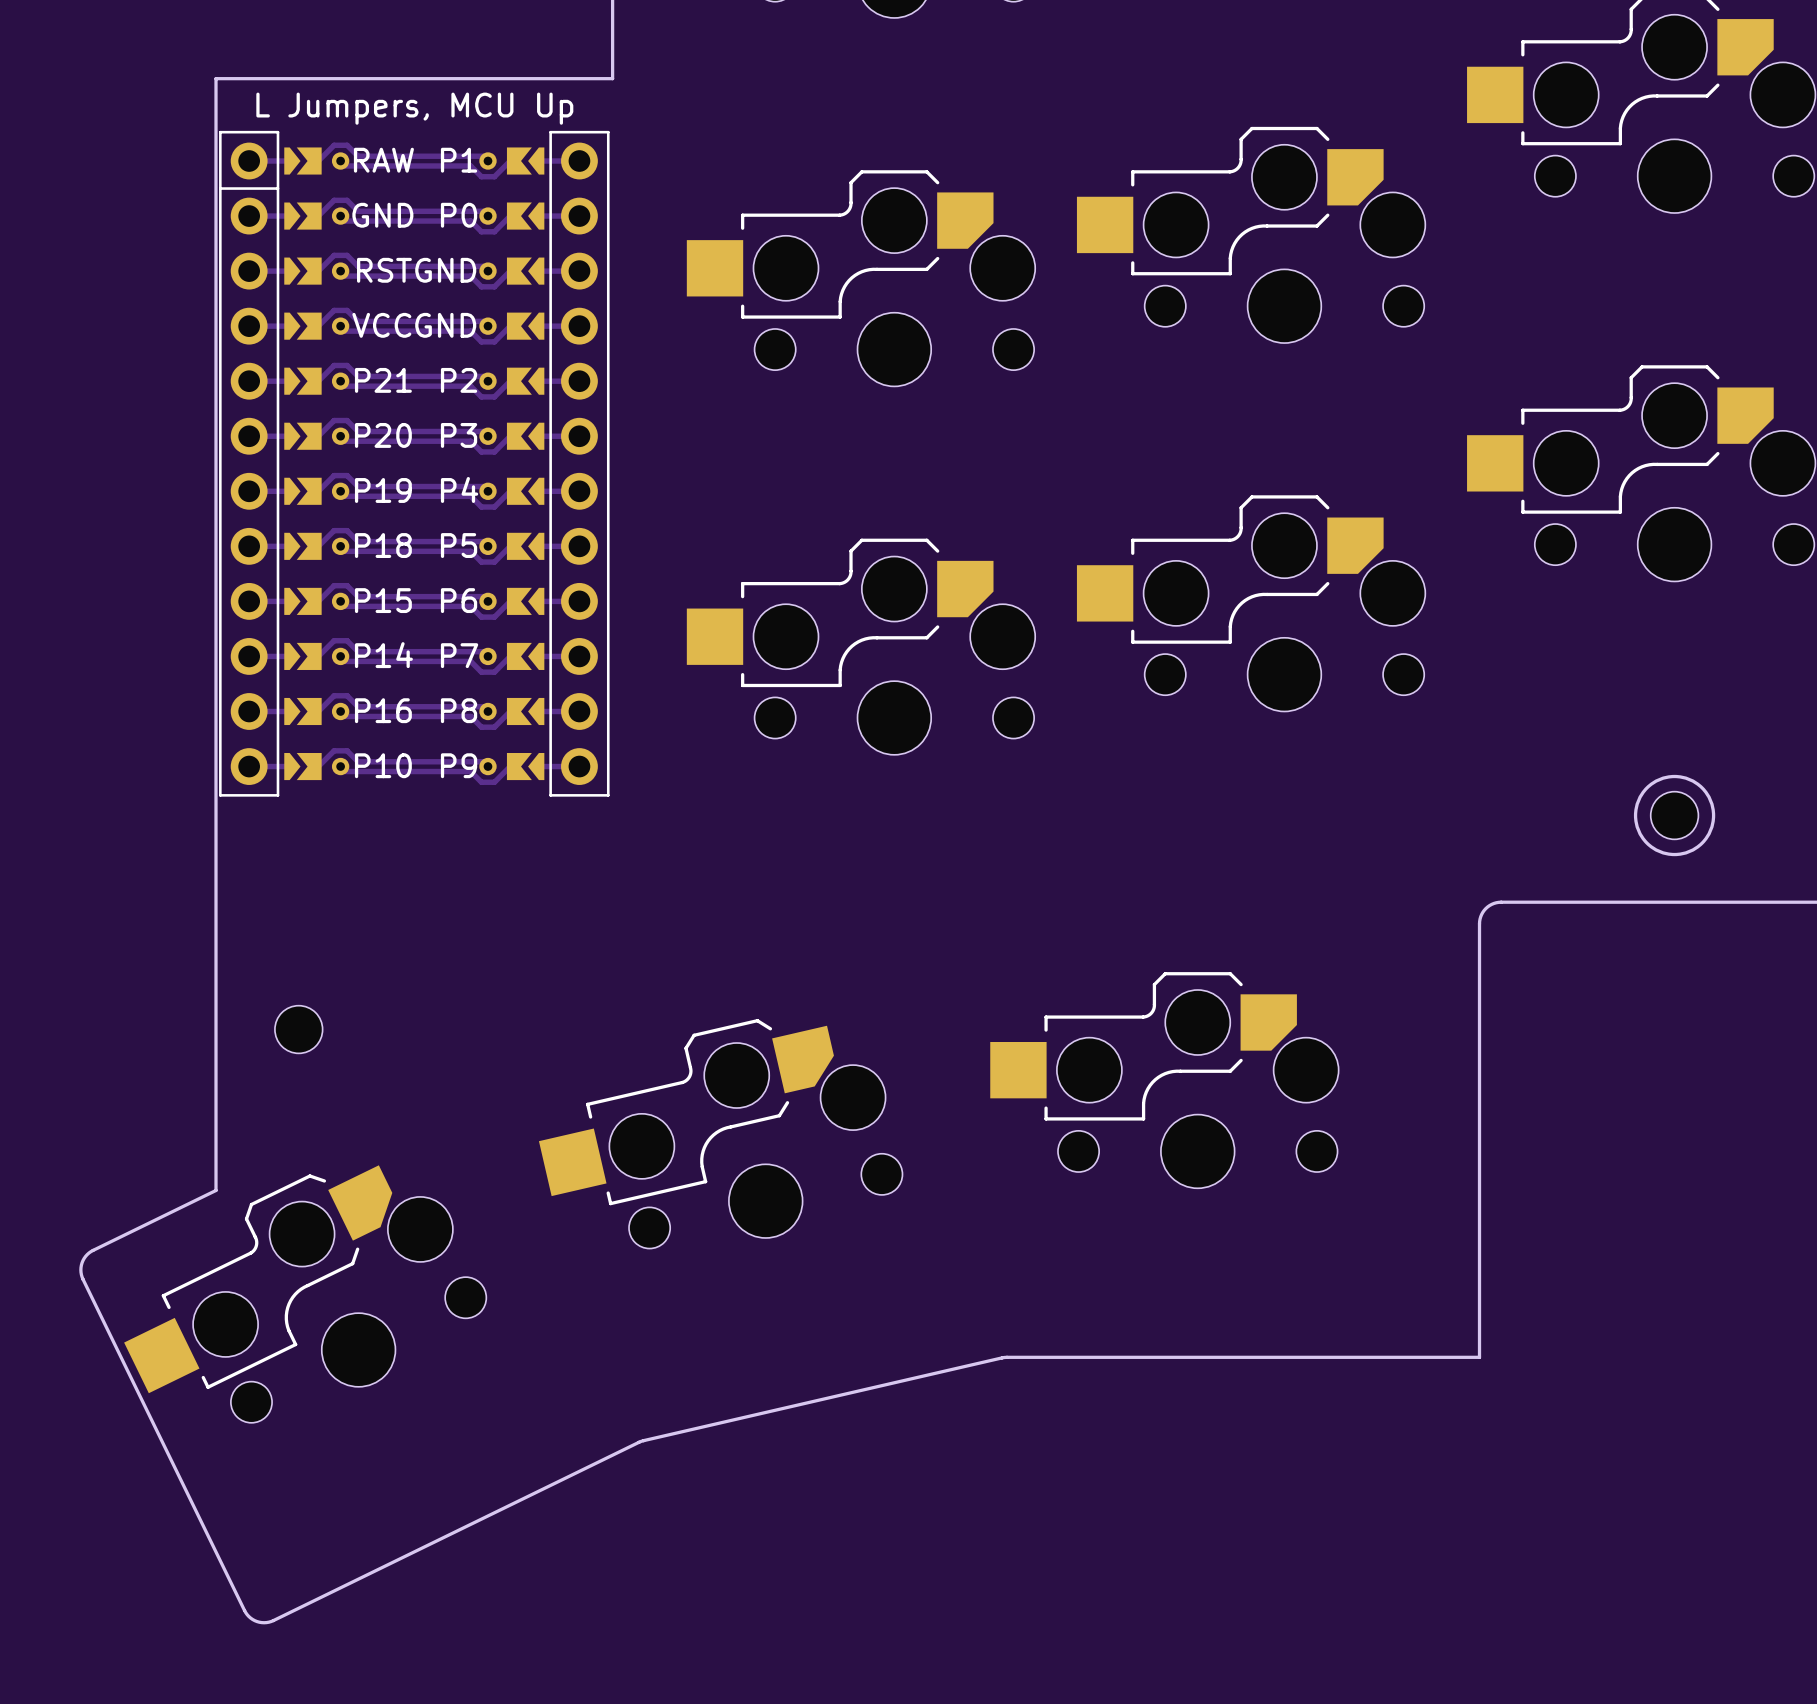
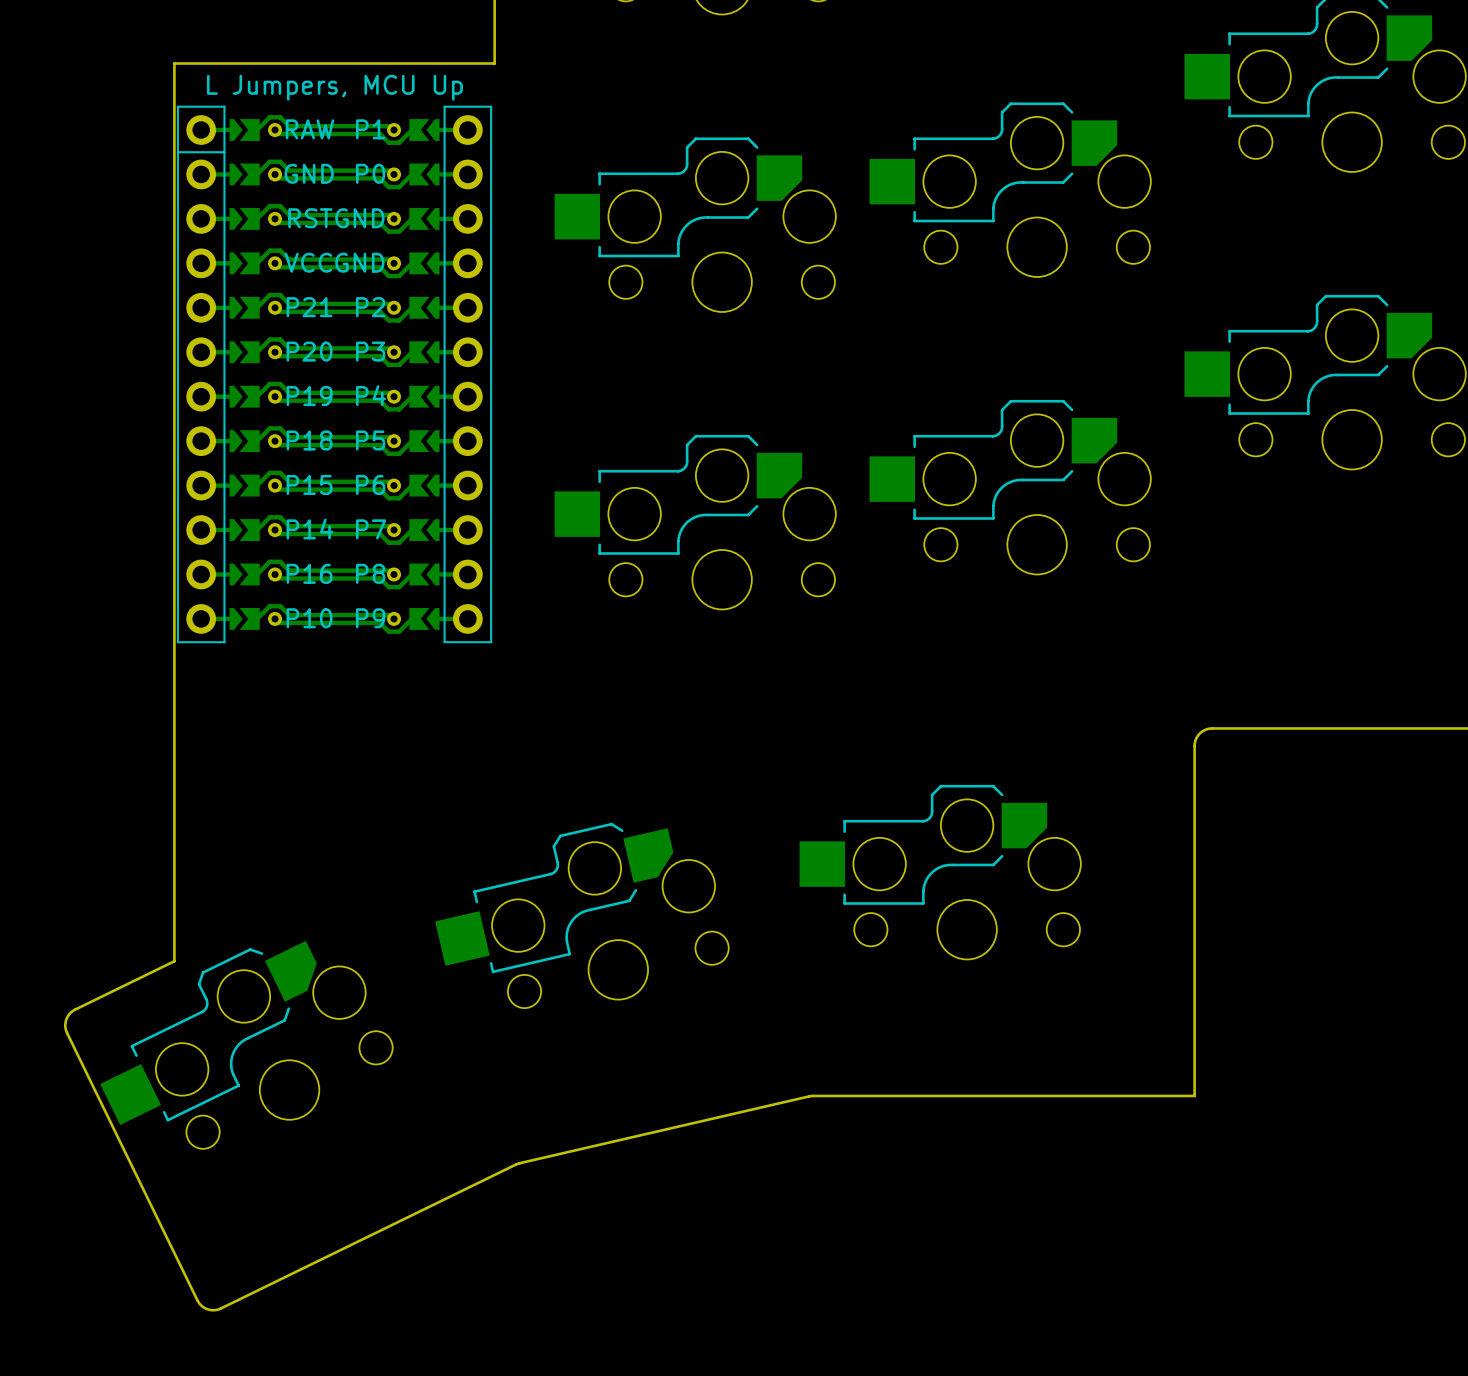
round board edge: [1633, 774, 1716, 857] -> none
part: (1674, 815) -> none
part: (298, 1029) -> none

